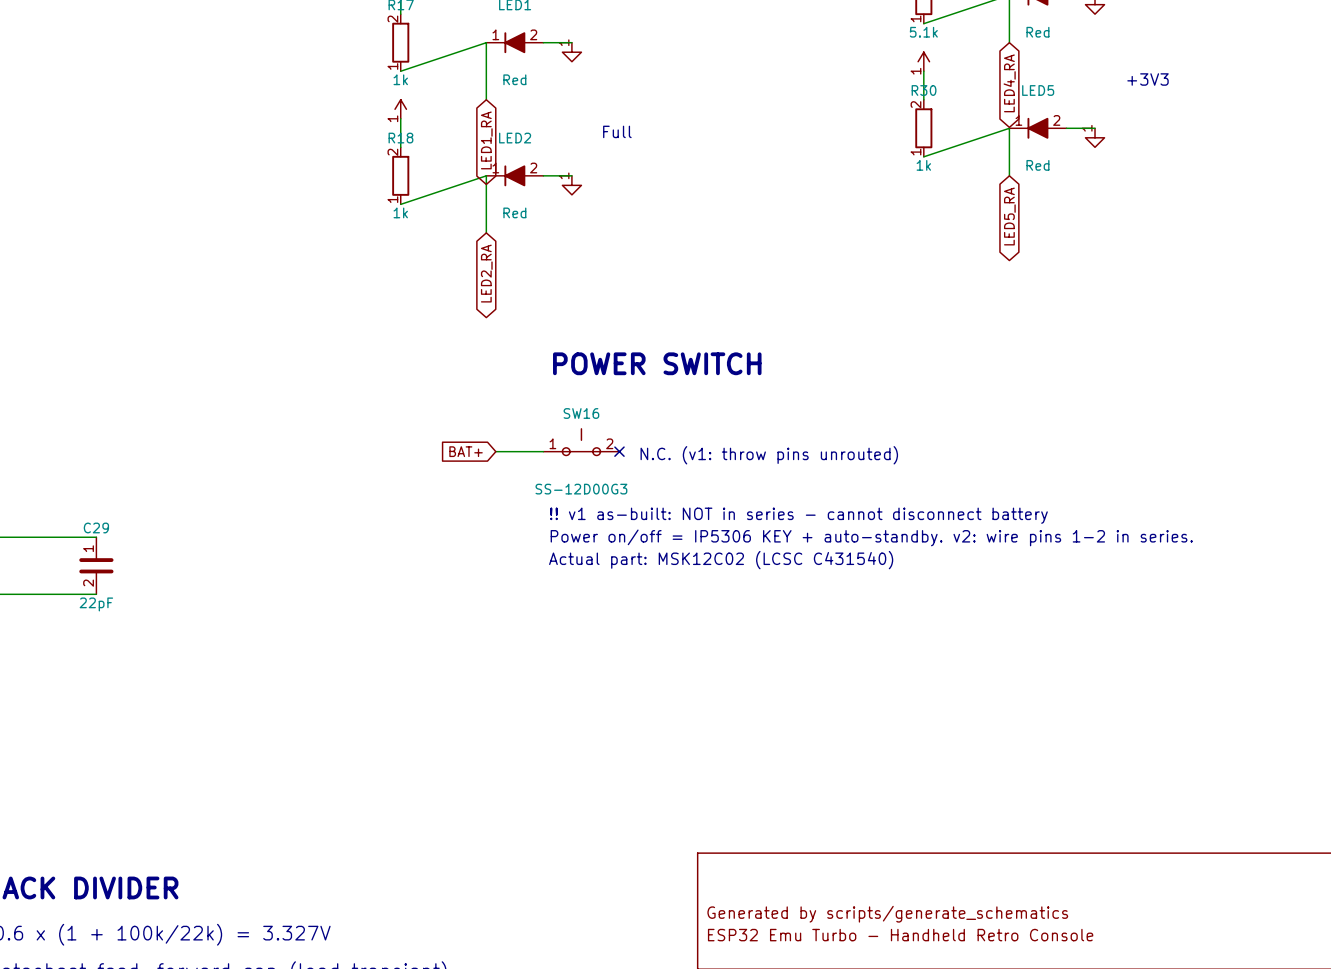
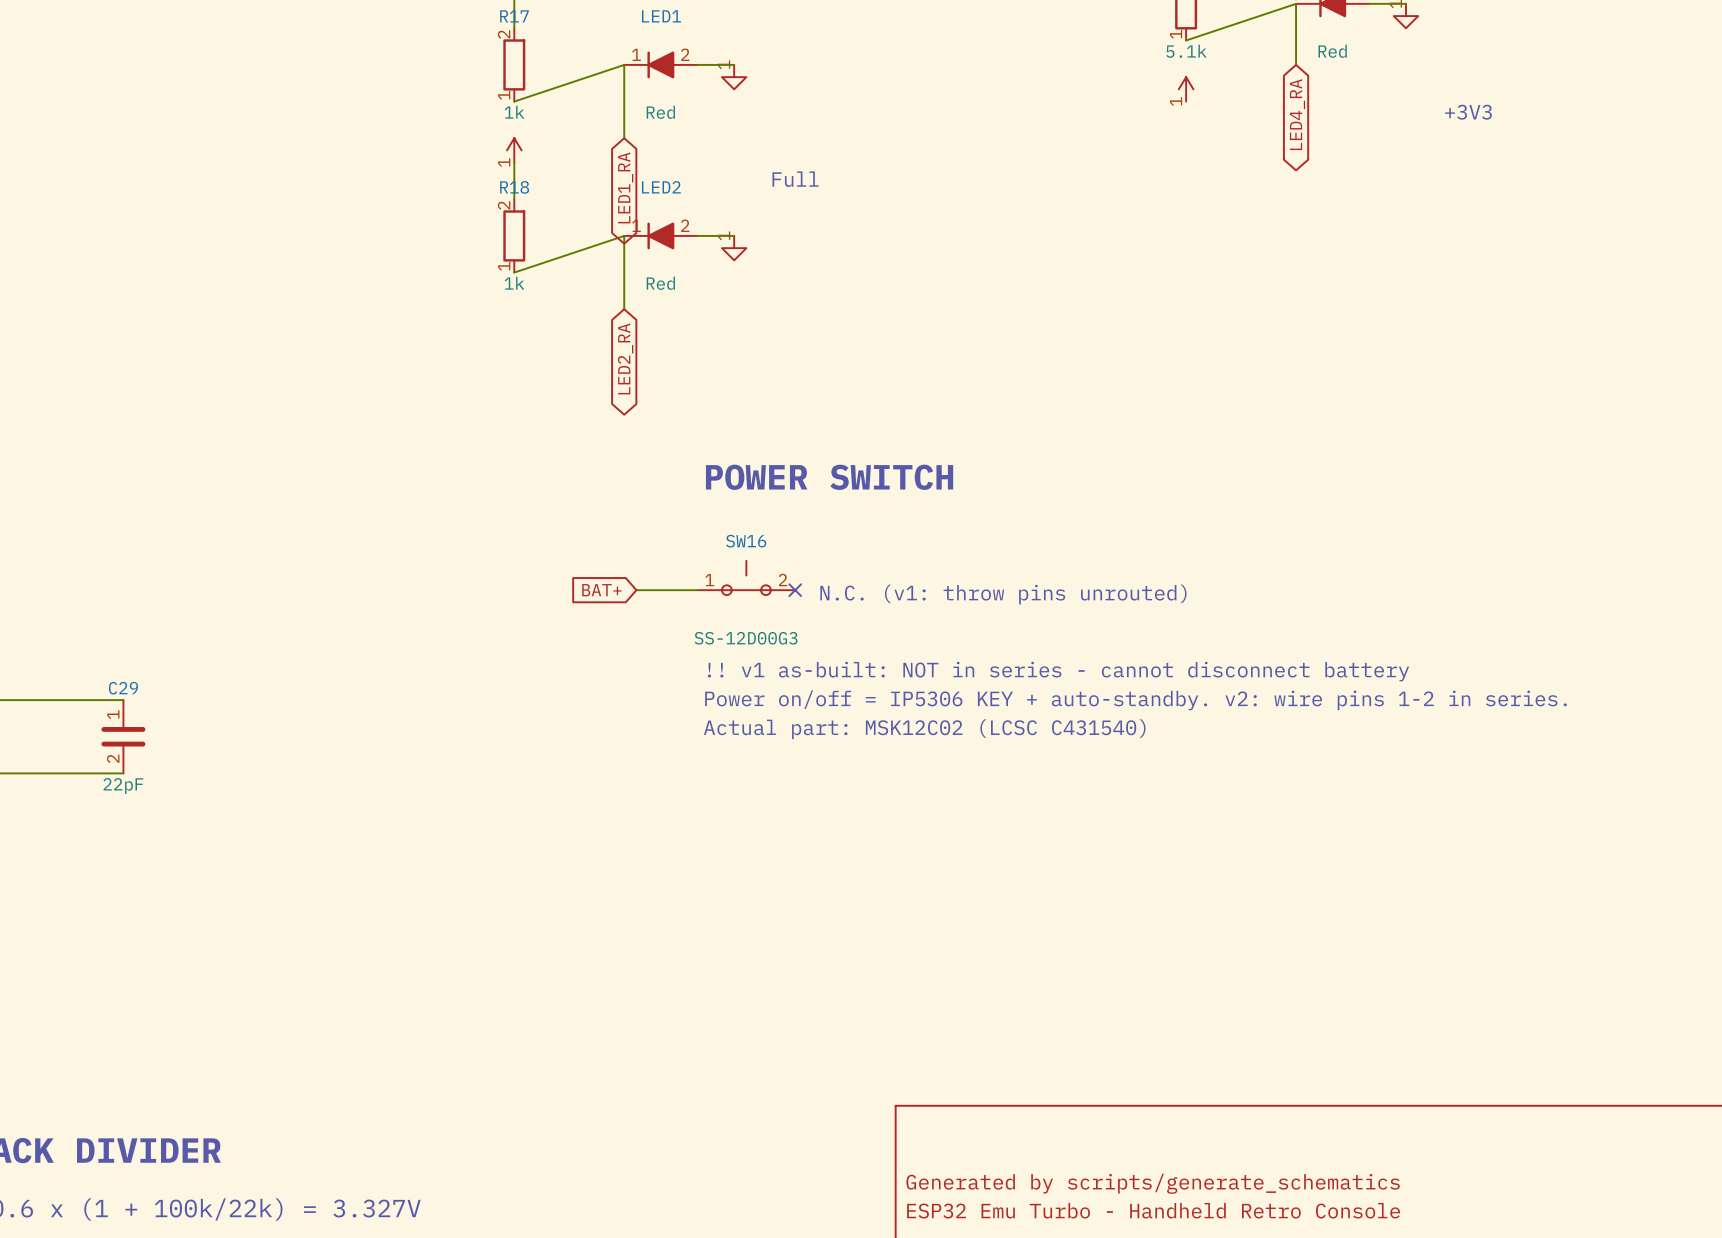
wire: (923, 71) (923, 99) -> none
R30: 1k (923, 128) -> none
LED5: Red (1037, 128) -> none
wire: (1066, 128) (1095, 128) -> none
power symbol: (1095, 137) -> none
wire: (923, 156) (1009, 128) (1009, 175) -> none
global label: LED5_RA (1009, 216) -> none

